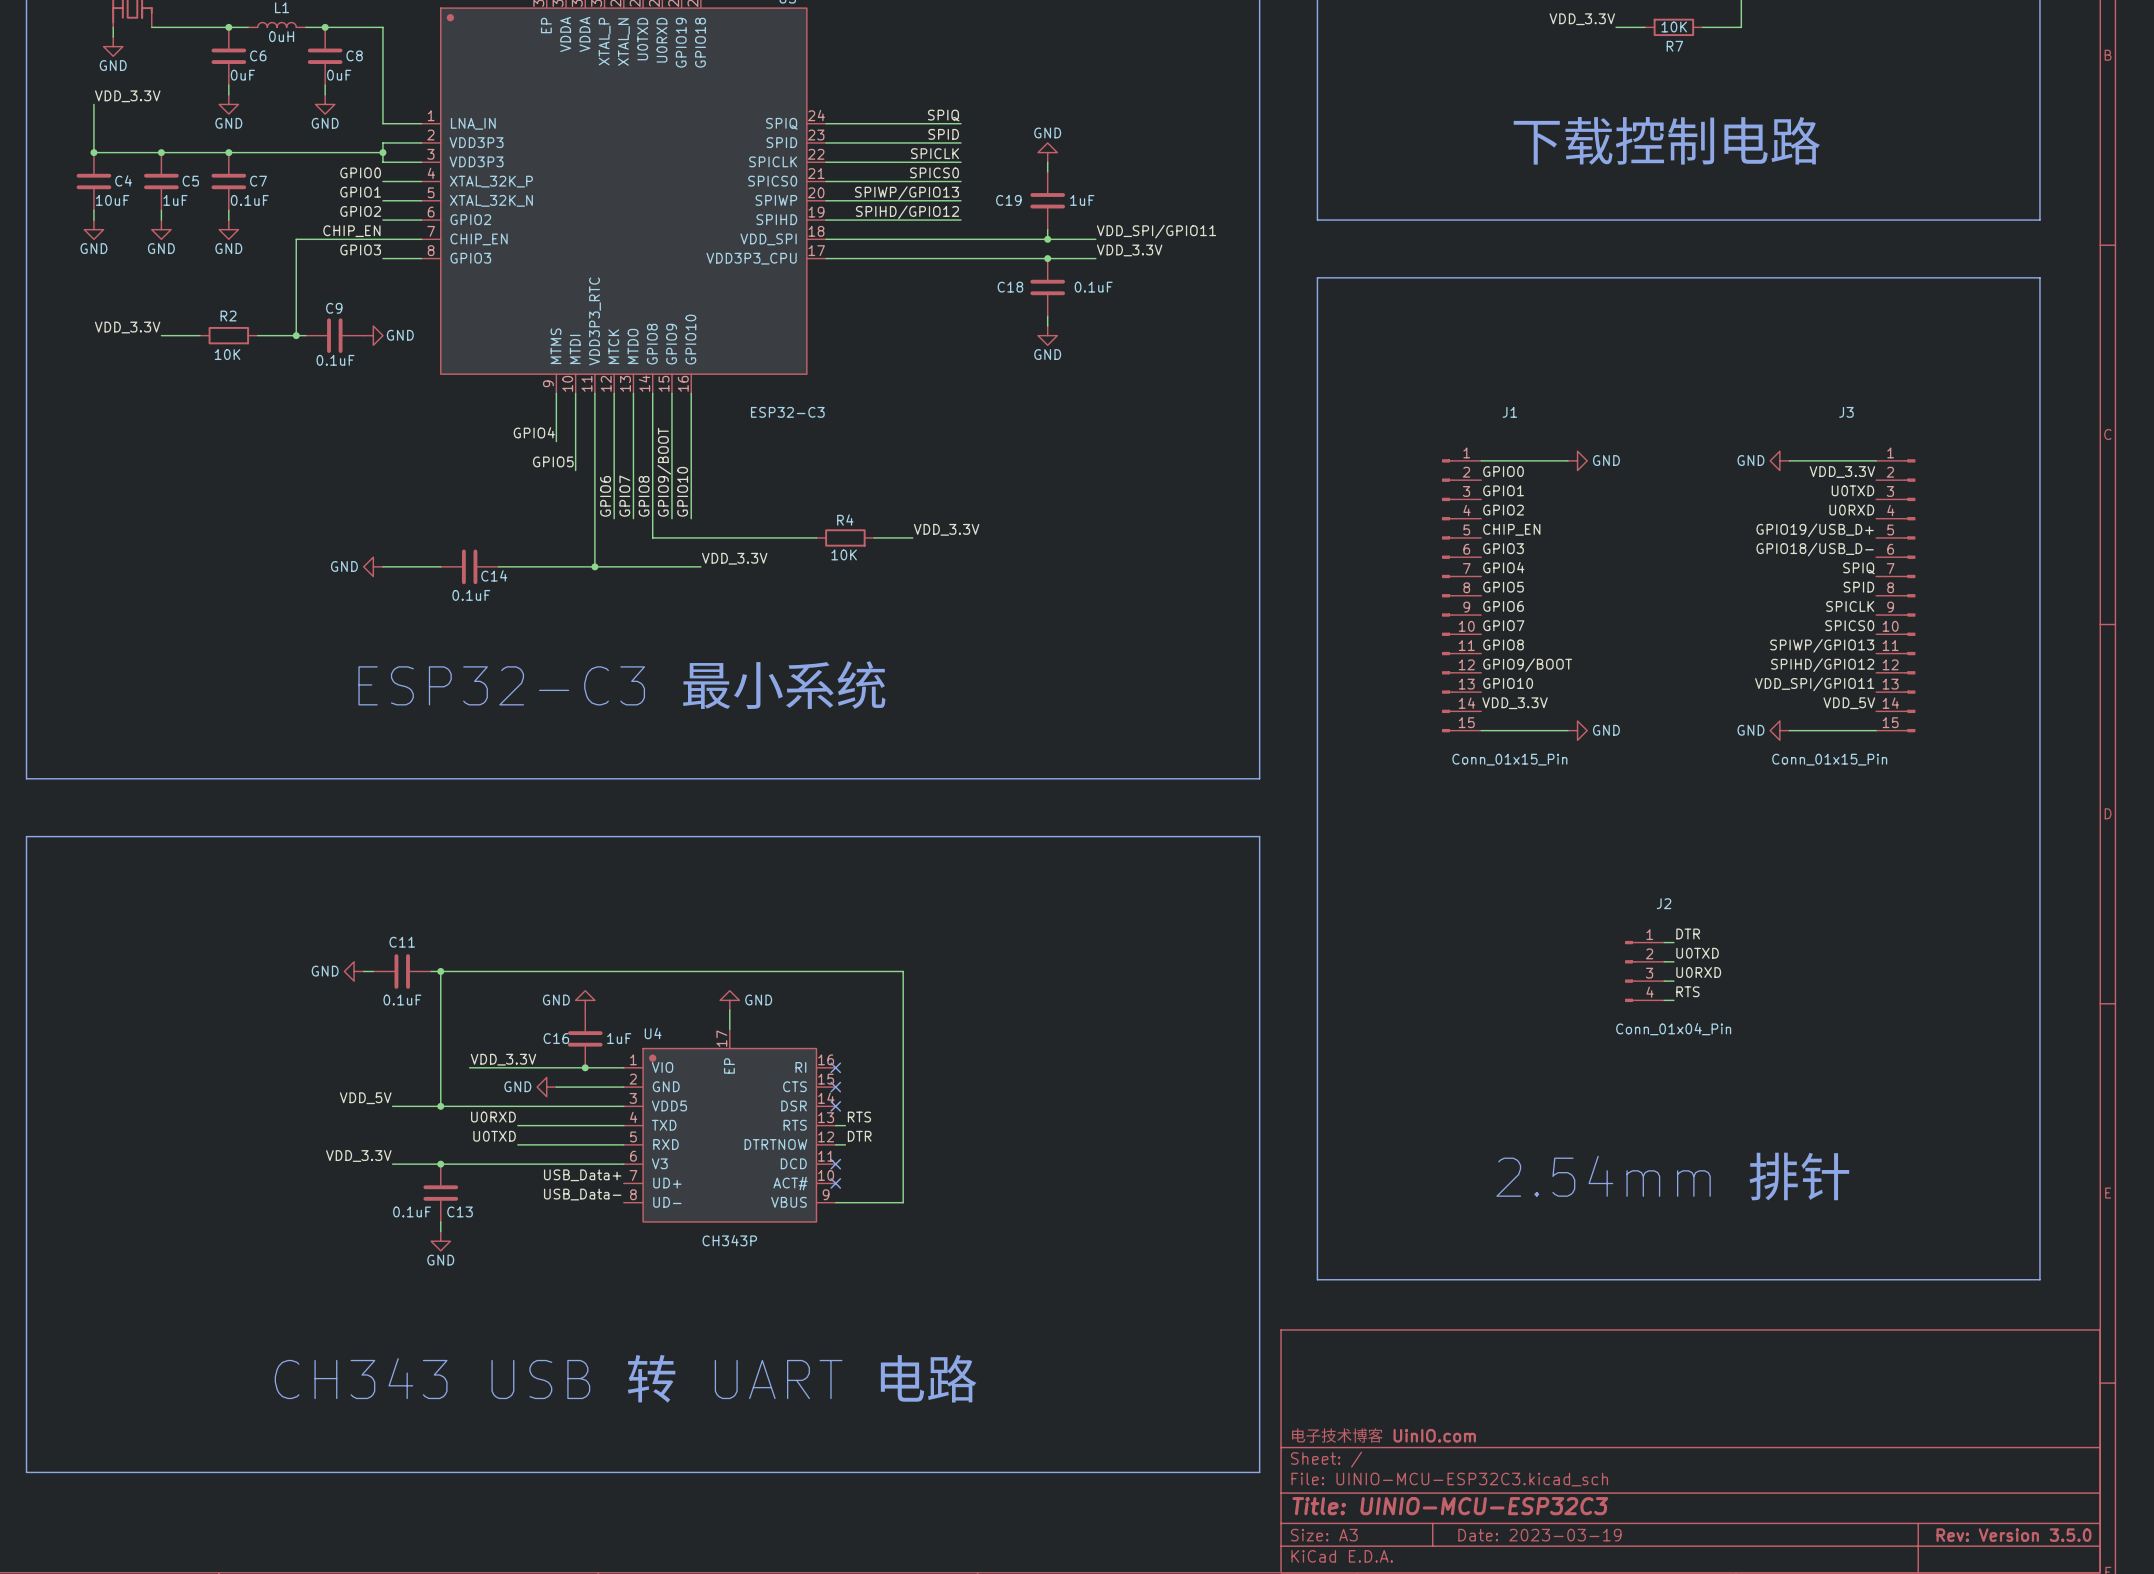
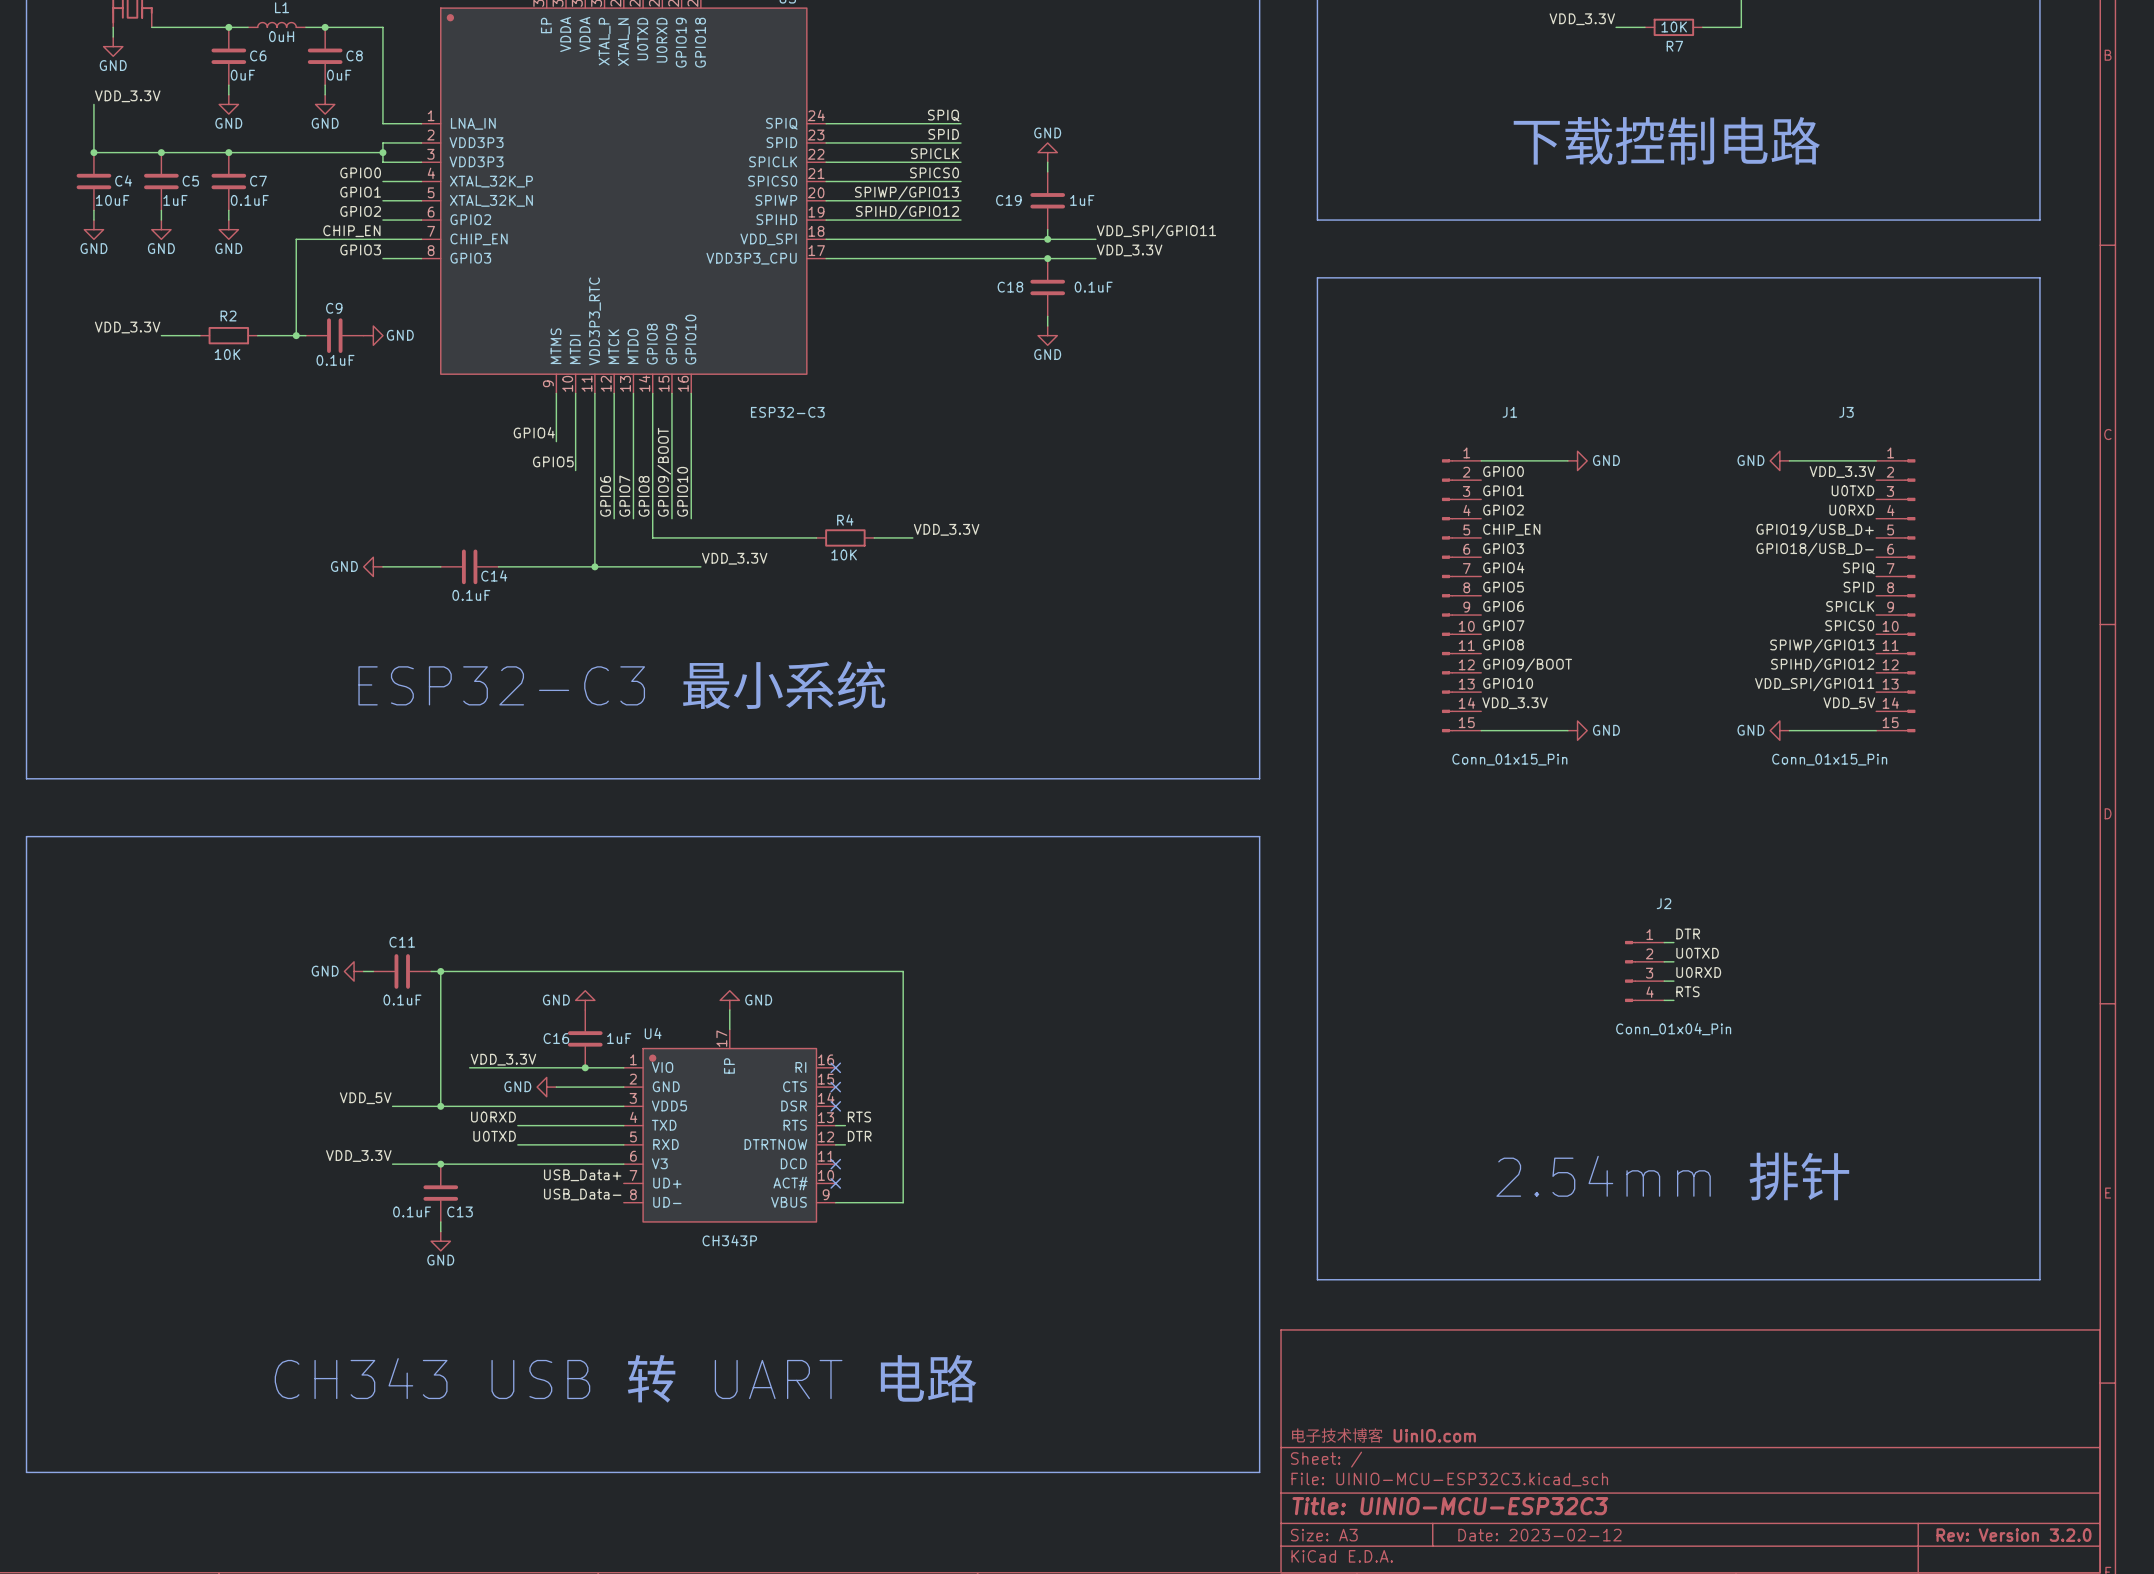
title block: Date: 2023-03-19 (1539, 1535) -> Date: 2023-02-12 (1539, 1535)
title block: Rev: Version 3.5.0 (2013, 1535) -> Rev: Version 3.2.0 (2013, 1535)

